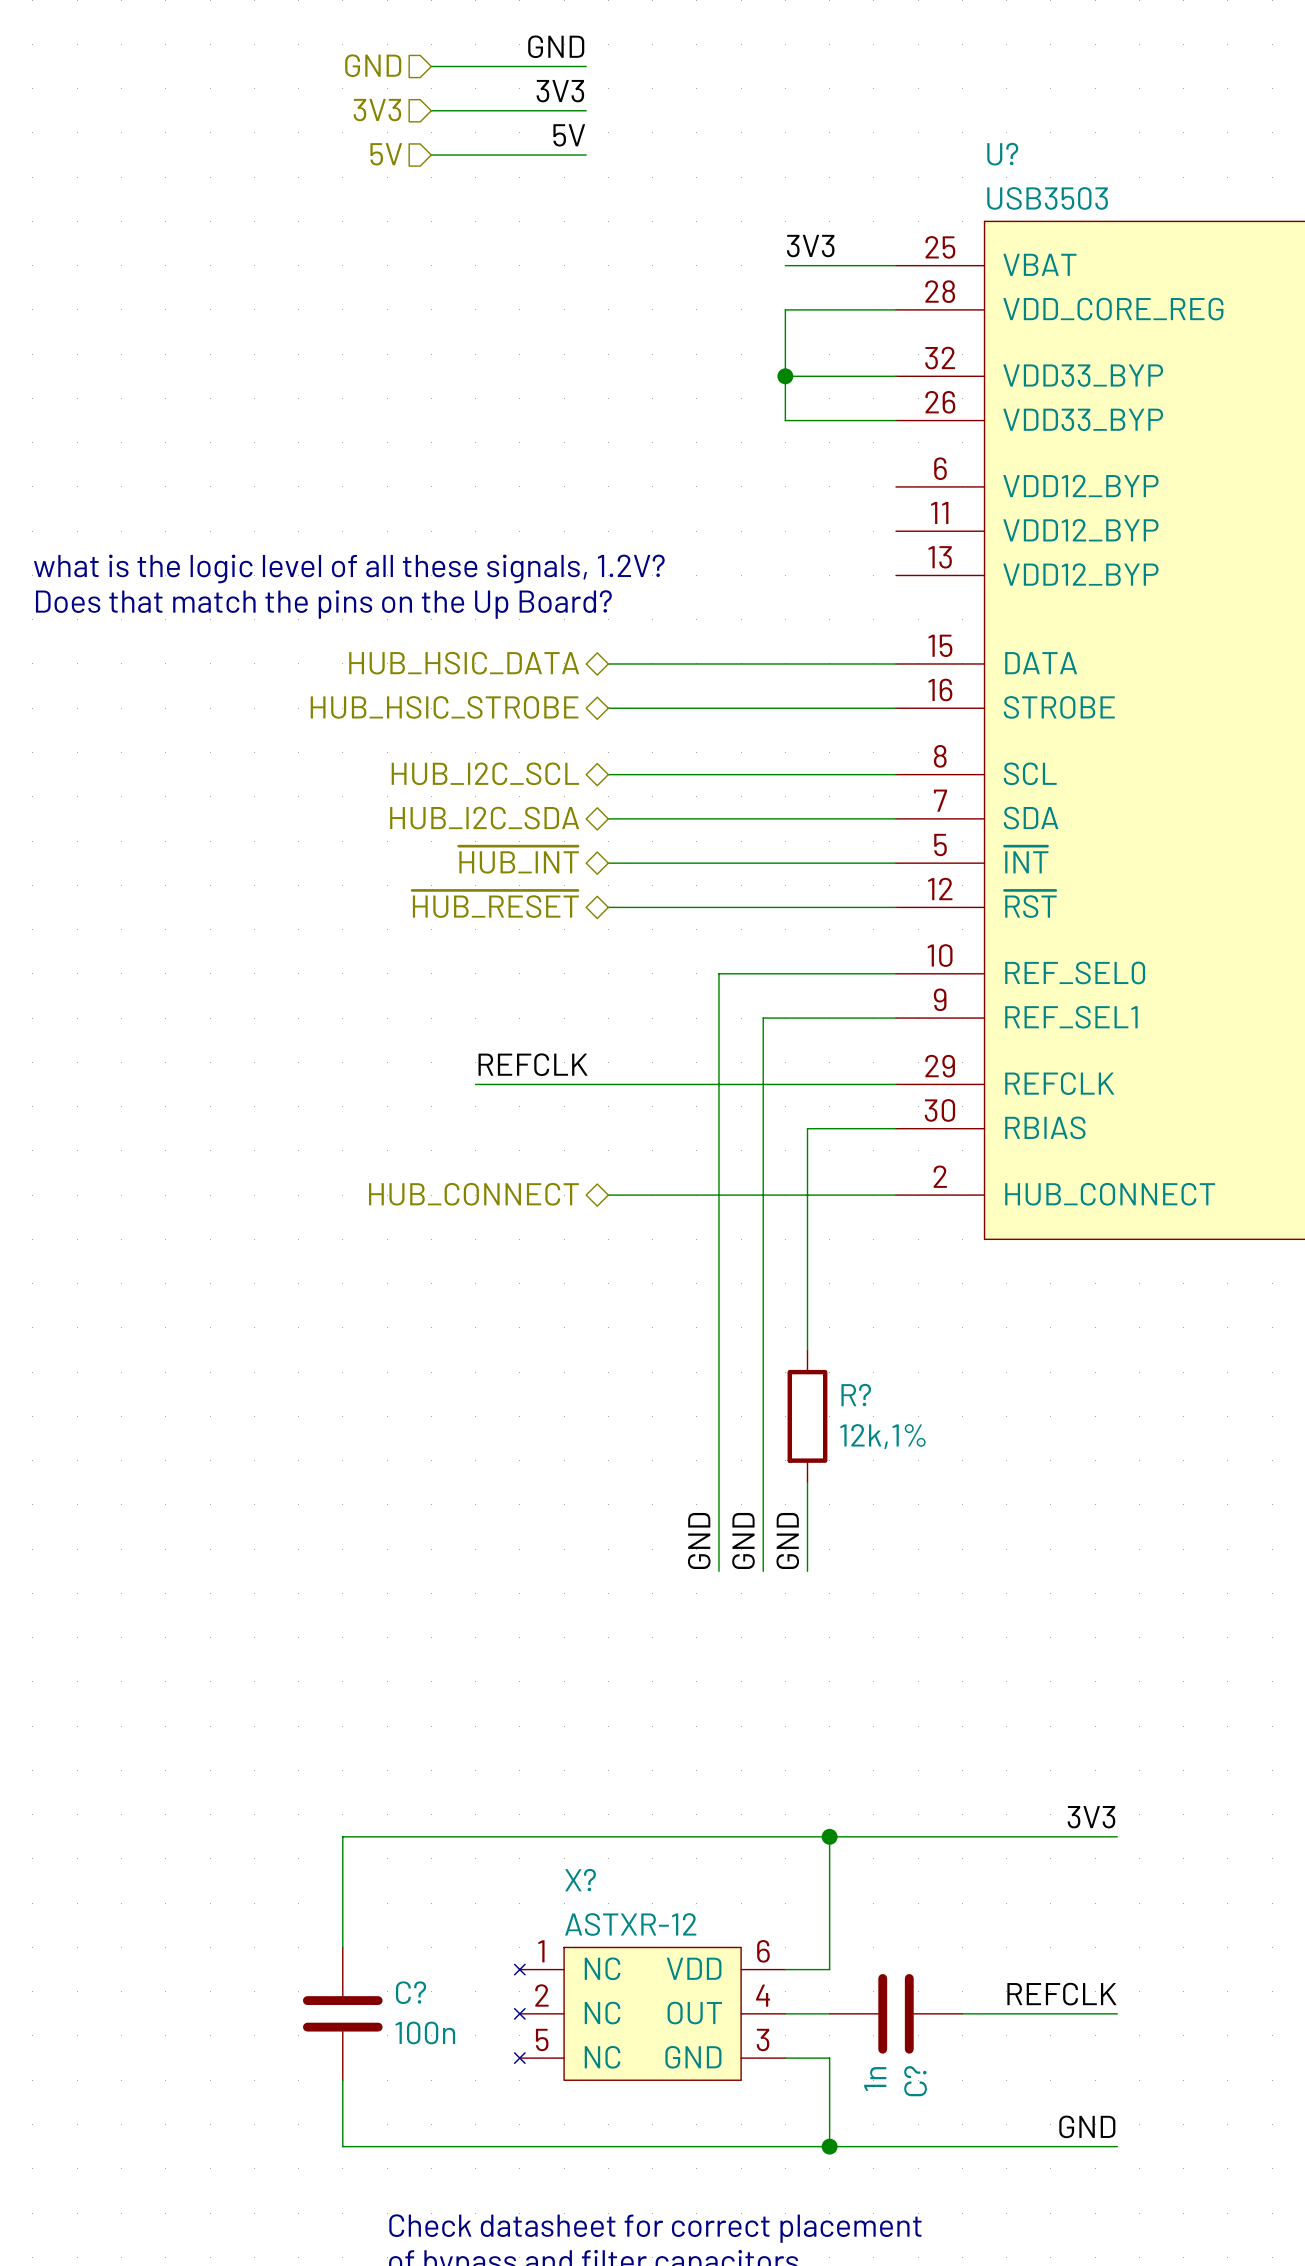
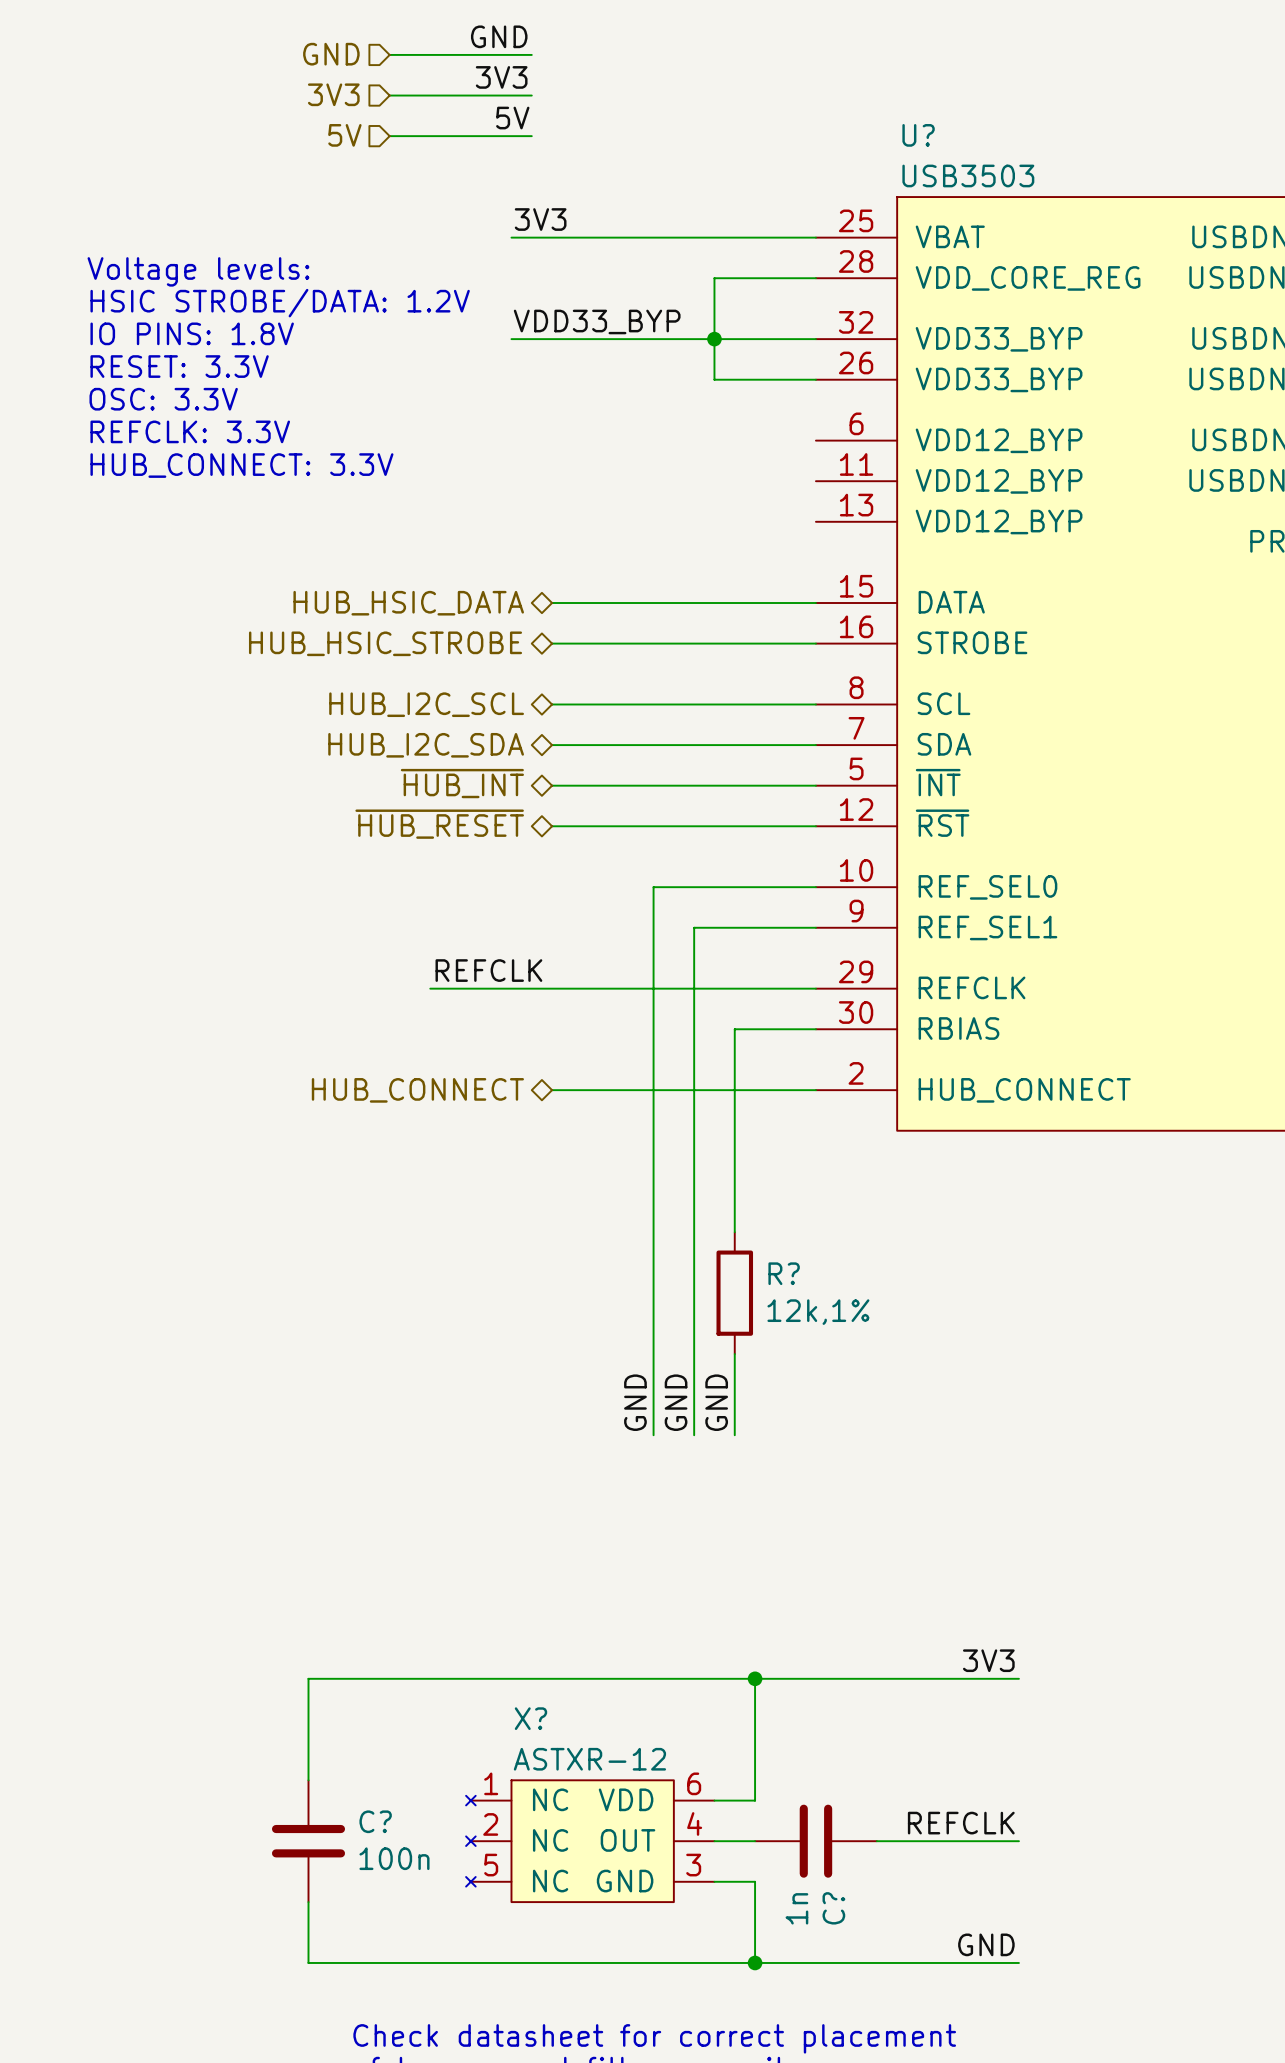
label position: 3V3 (810, 246) -> 3V3 (540, 219)
wire: none -> (511, 237) (714, 237)
text: none -> Voltage levels: (198, 271)
text: none -> HSIC STROBE/DATA: 1.2V (280, 303)
label: none -> VDD33_BYP (597, 321)
text: none -> IO PINS: 1.8V (192, 333)
wire: none -> (511, 339) (714, 339)
text: none -> RESET: 3.3V (179, 366)
text: none -> OSC: 3.3V (163, 399)
text: none -> REFCLK: 3.3V (190, 431)
text: none -> HUB_CONNECT: 3.3V (241, 465)
text: what is the logic level of all these signals, 1.2V? (349, 568) -> none
text: Does that match the pins on the Up Board? (323, 604) -> none

